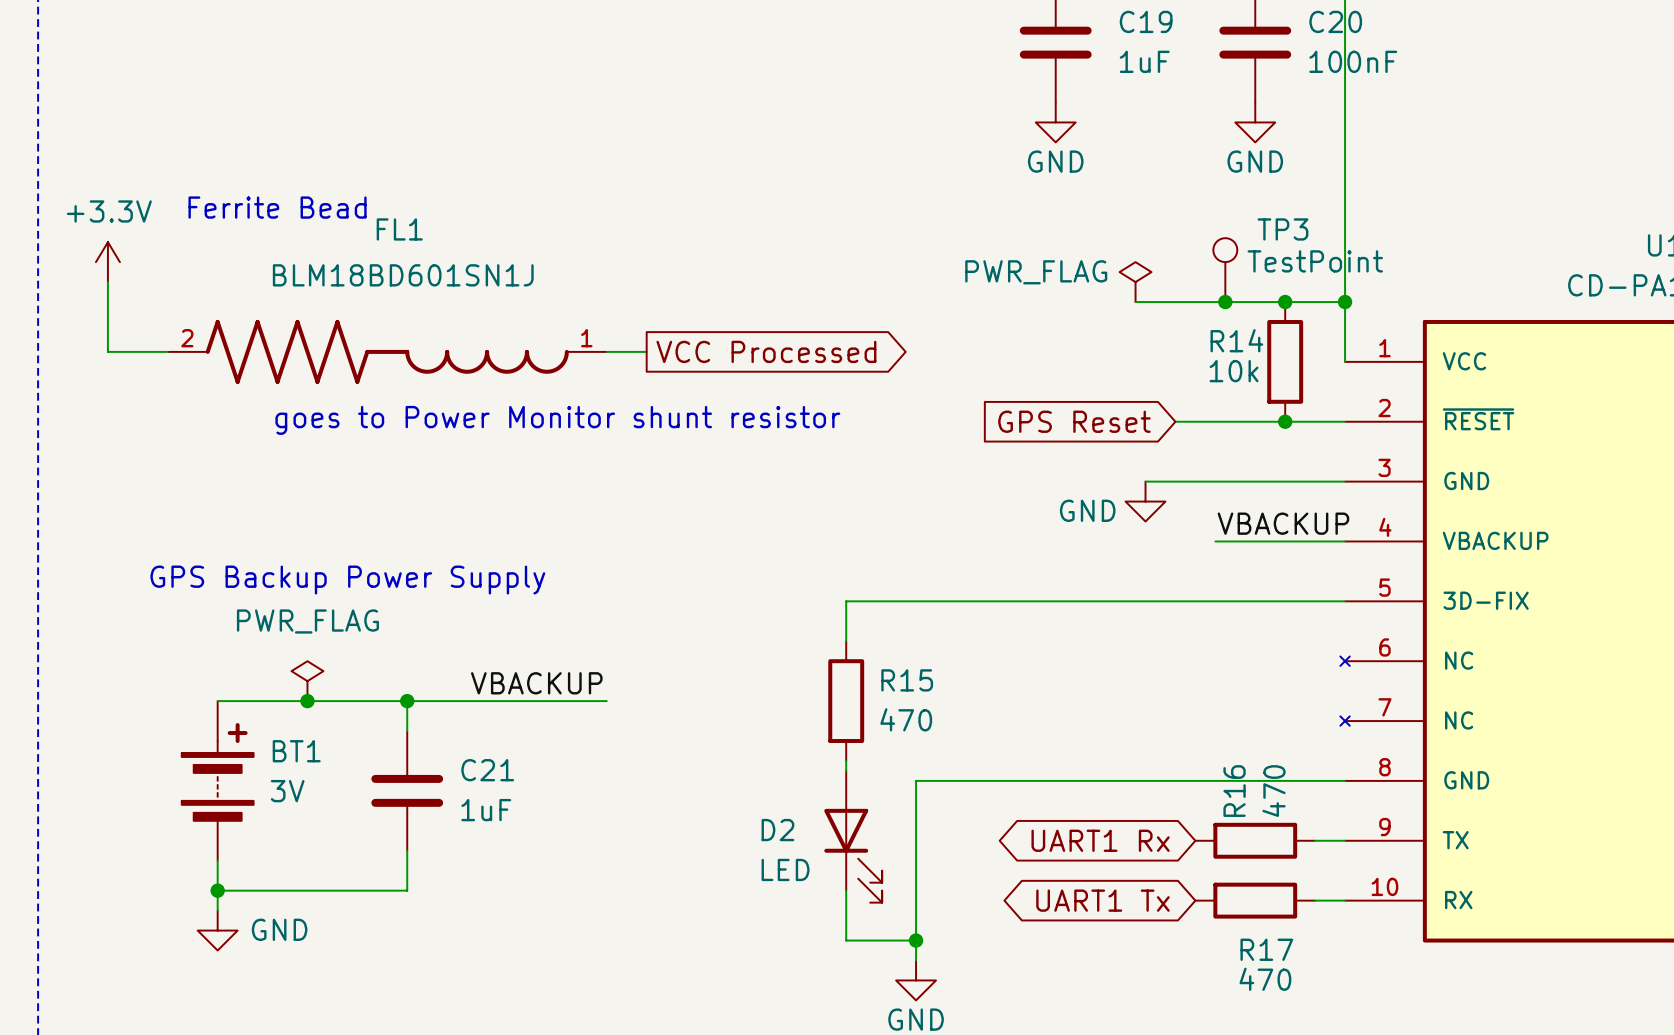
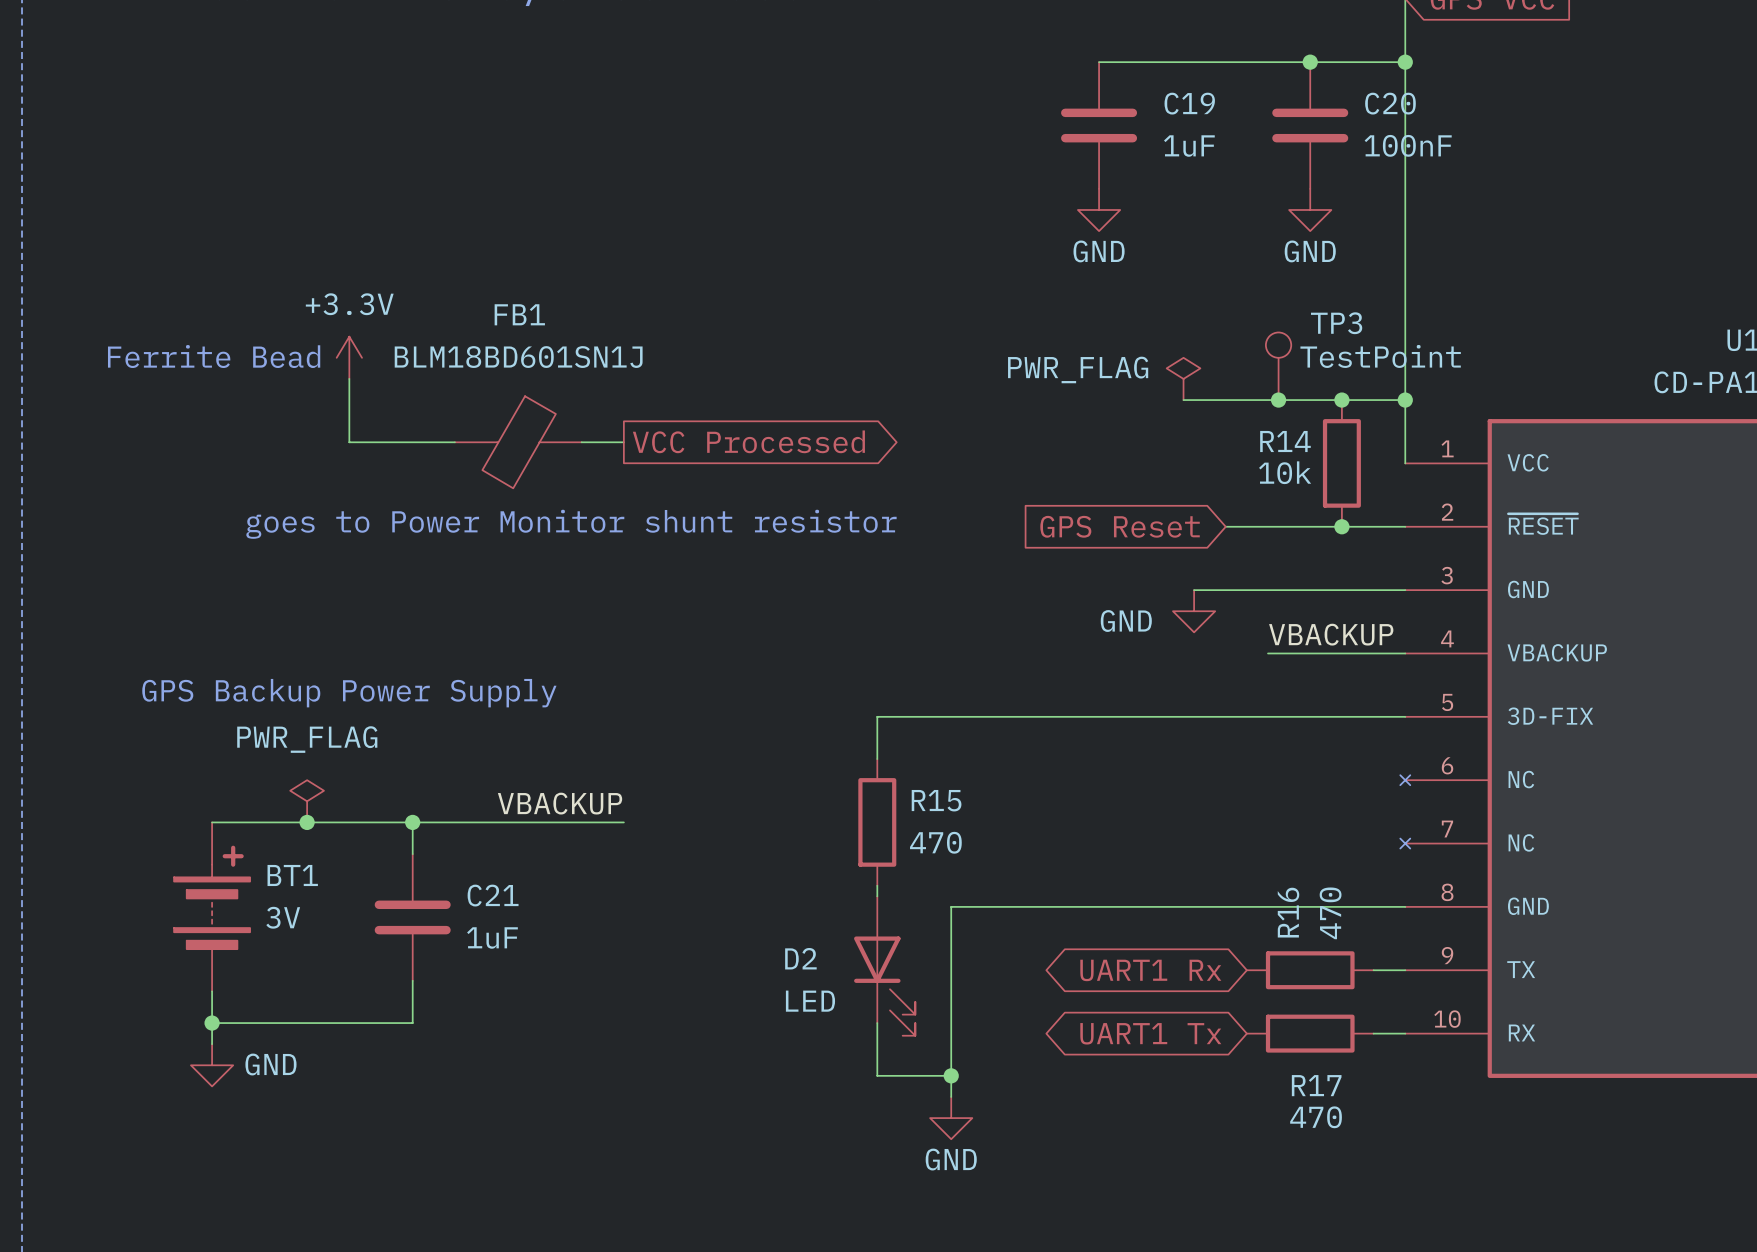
text position: Ferrite Bead (277, 207) -> Ferrite Bead (214, 356)
power symbol position: +3.3V (107, 262) -> +3.3V (349, 357)
wire: (107, 282) (107, 351) (167, 351) -> none
wire: none -> (349, 378) (349, 442) (454, 442)
FB1: none -> BLM18BD601SN1J (518, 442)
FL1: BLM18BD601SN1J (387, 351) -> none
wire: (606, 351) (646, 351) -> (581, 442) (623, 442)
global label position: VCC Processed (766, 351) -> VCC Processed (748, 441)

